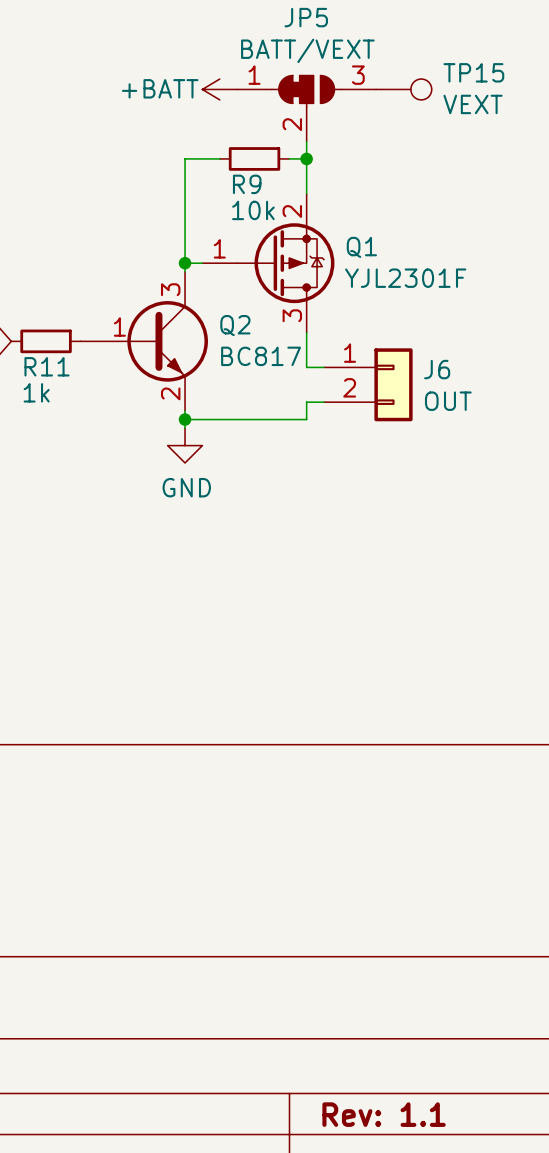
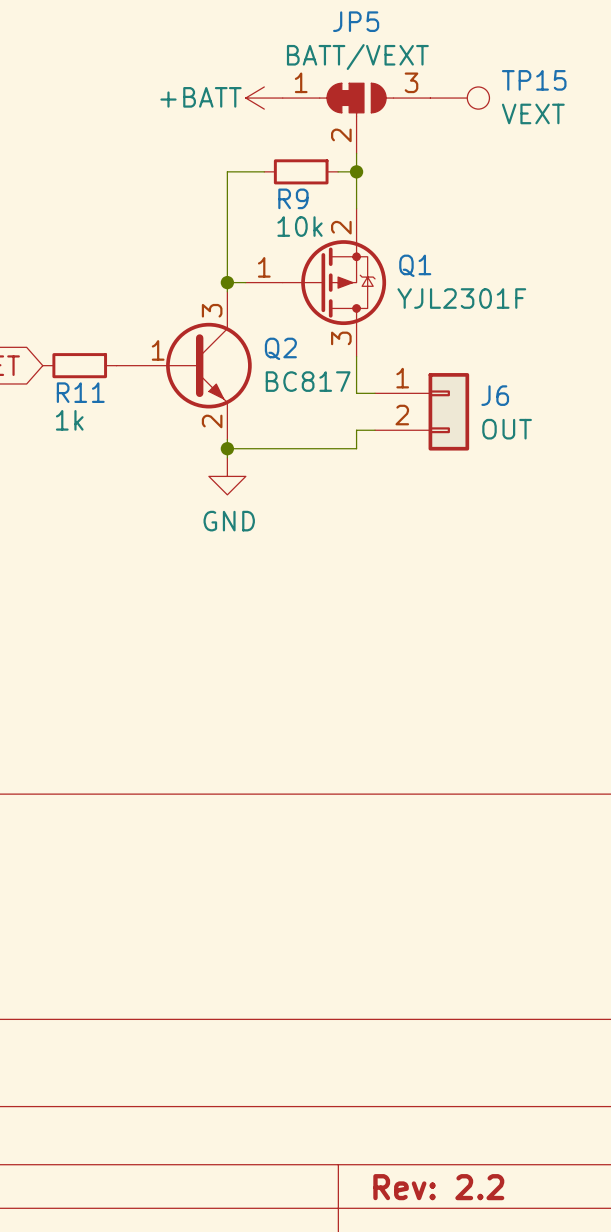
title block: Rev: 1.1 (384, 1114) -> Rev: 2.2 (438, 1187)

